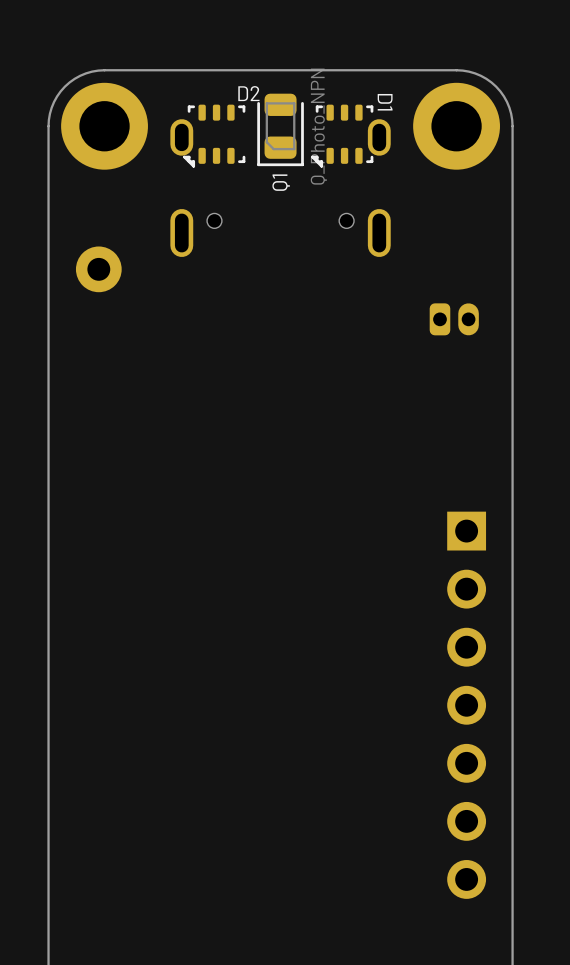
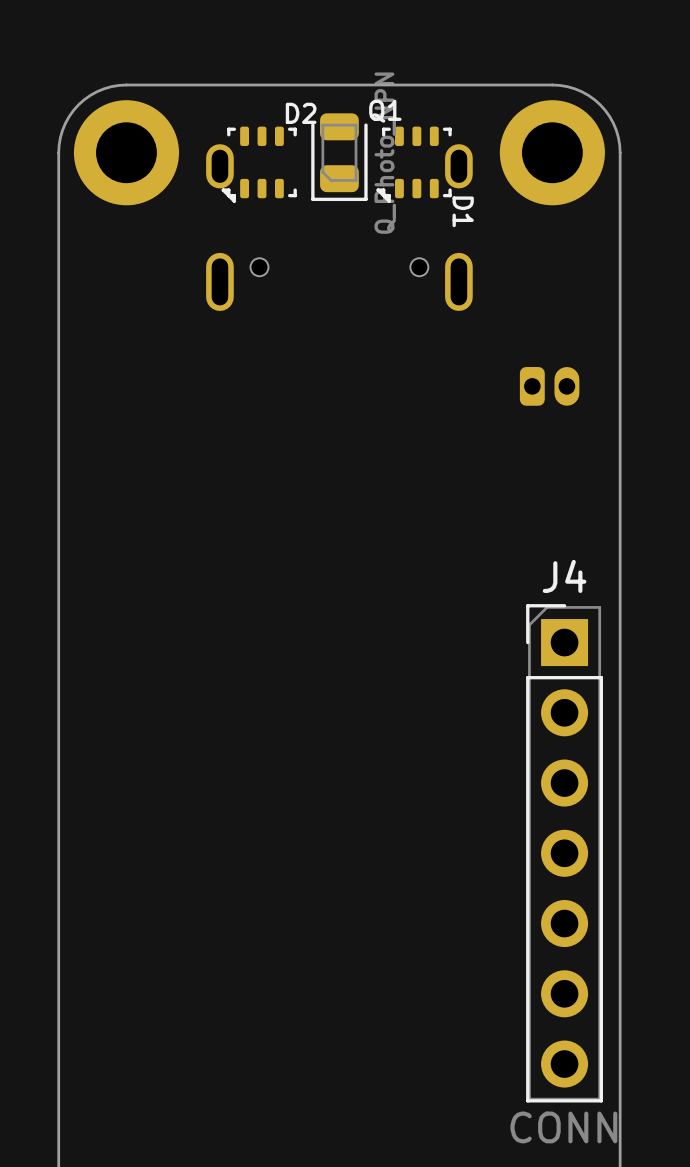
D1 name position: D1 (385, 102) -> D1 (463, 211)
Q1 name rotation: 0° (281, 182) -> 90° clockwise (385, 111)
Q1 name position: Q1 (281, 182) -> Q1 (385, 111)
part: (98, 269) -> none
J4 side: top (466, 705) -> bottom (564, 853)

